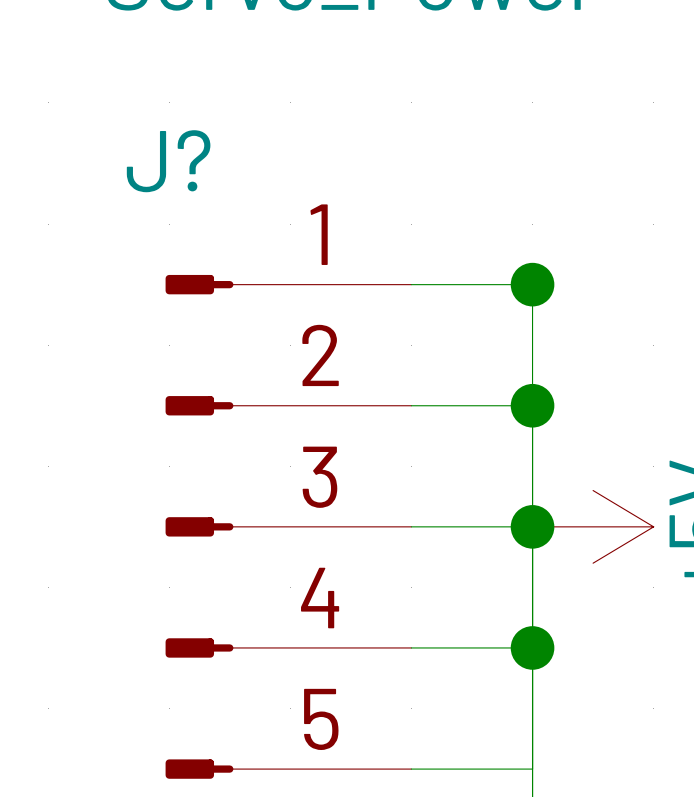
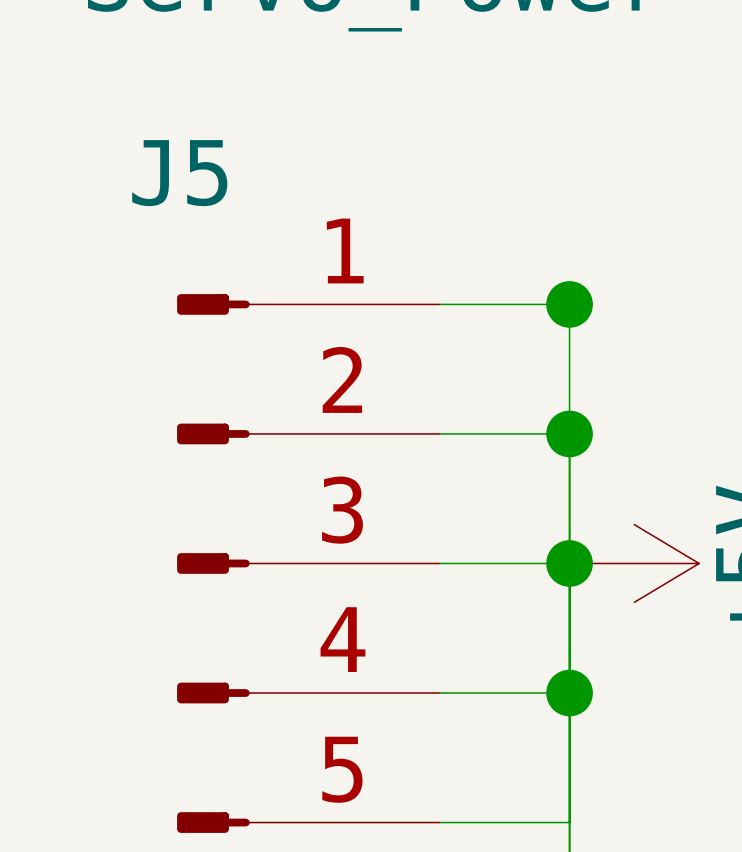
J? name: J? (168, 161) -> J5 (179, 173)

